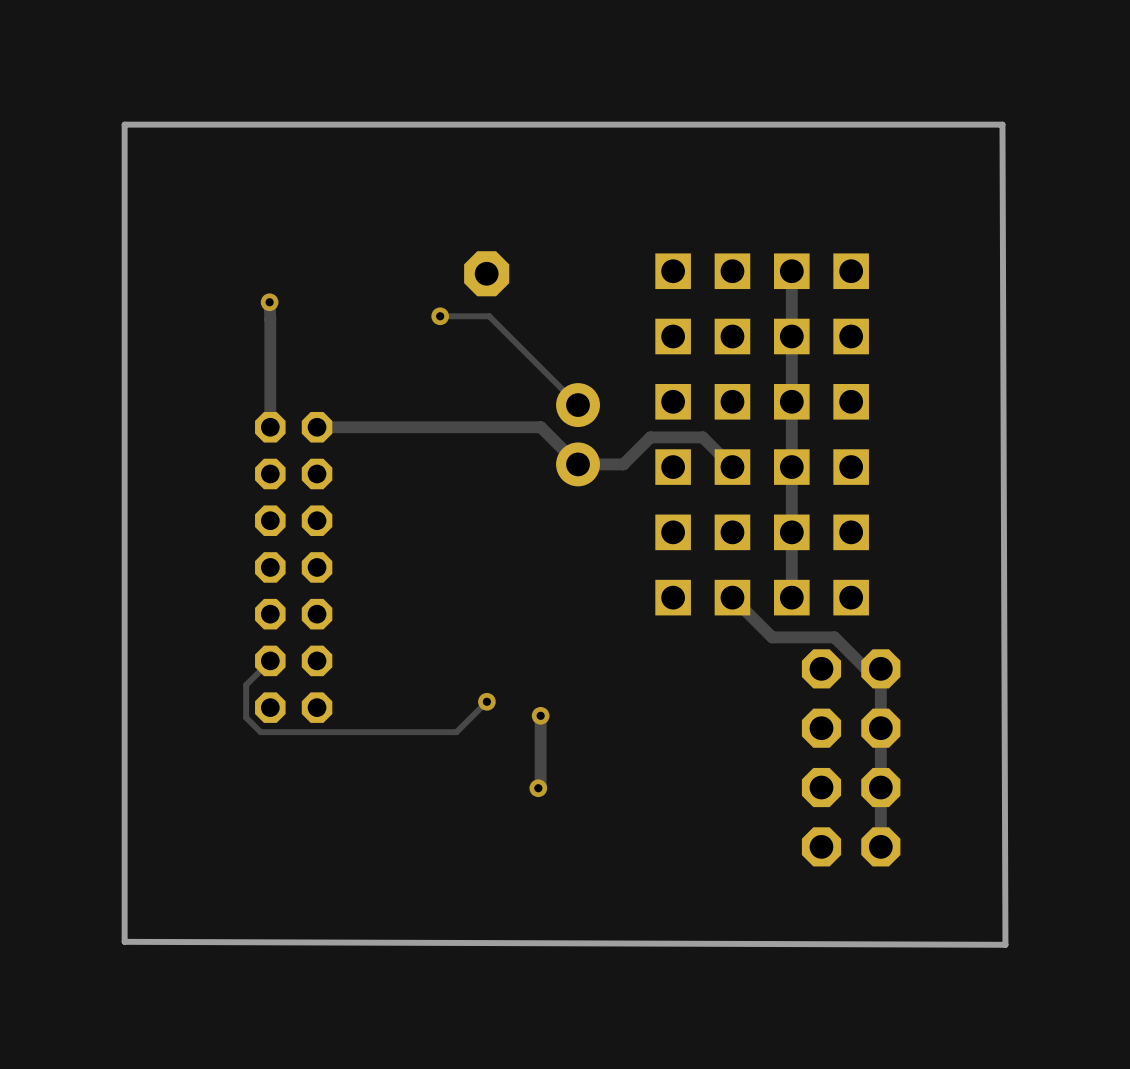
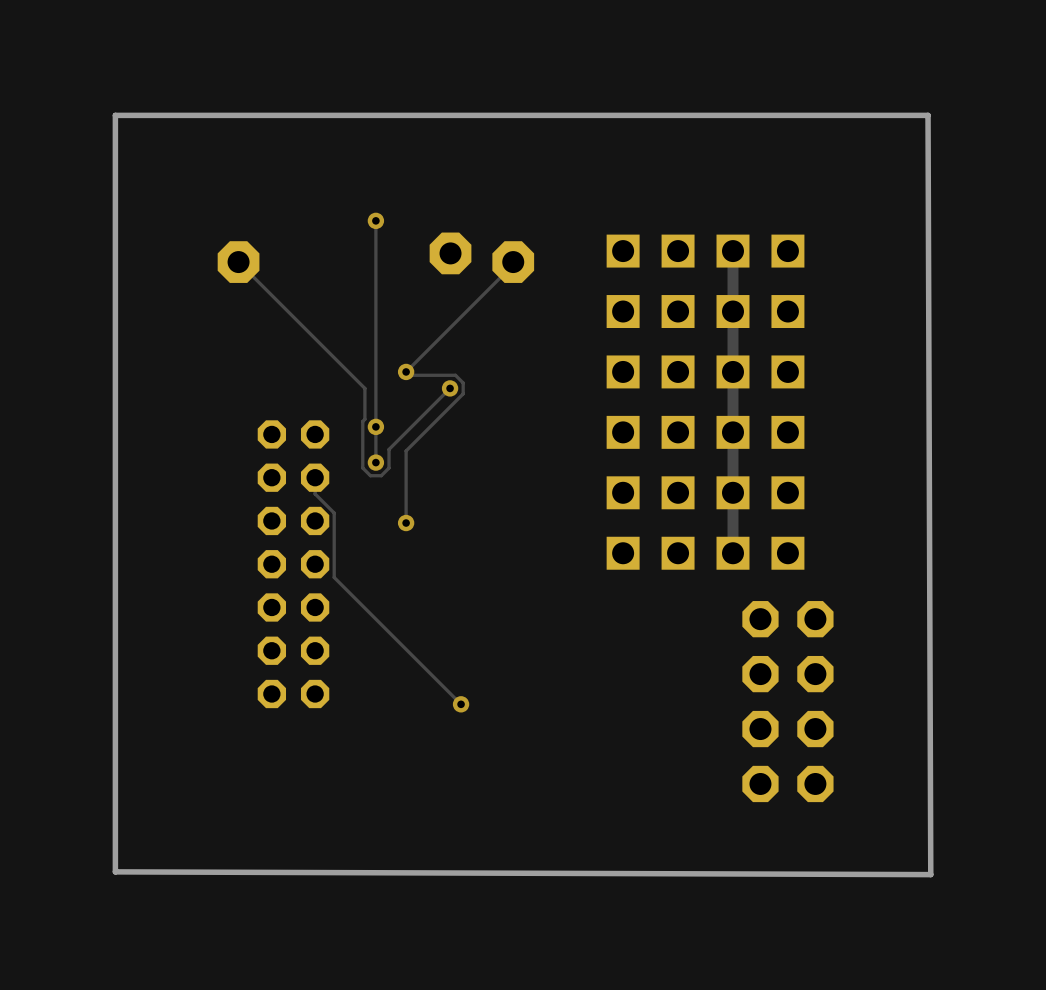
track: none -> (375, 220) (375, 462)
via: none -> (375, 220)
track: none -> (238, 262) (364, 388) (362, 468) (370, 475) (381, 475) (389, 468) (389, 449) (450, 388)
part: none -> (238, 262)
track: none -> (513, 262) (513, 264) (403, 374)
part: none -> (513, 262)
track: (269, 302) (270, 427) -> none
via: (269, 302) -> none
track: (440, 316) (489, 316) (578, 405) -> none
via: (440, 316) -> none
track: none -> (406, 371) (409, 375) (455, 375) (463, 382) (463, 393) (406, 450) (406, 523)
via: none -> (406, 371)
via: none -> (450, 388)
track: (317, 427) (540, 427) (578, 464) (623, 464) (650, 437) (702, 437) (732, 467) -> none
part: (578, 434) -> none
via: none -> (375, 426)
via: none -> (375, 462)
track: none -> (315, 477) (315, 493) (334, 513) (334, 577) (461, 704)
via: none -> (406, 523)
part position: (293, 567) -> (293, 564)
track: (732, 597) (772, 637) (834, 637) (865, 668) (880, 668) (880, 846) -> none
track: (270, 660) (246, 685) (246, 717) (260, 732) (456, 732) (486, 701) -> none
via: (486, 701) -> none
track: (540, 715) (540, 785) (538, 788) -> none
via: (540, 715) -> none
via: none -> (461, 704)
via: (538, 788) -> none

